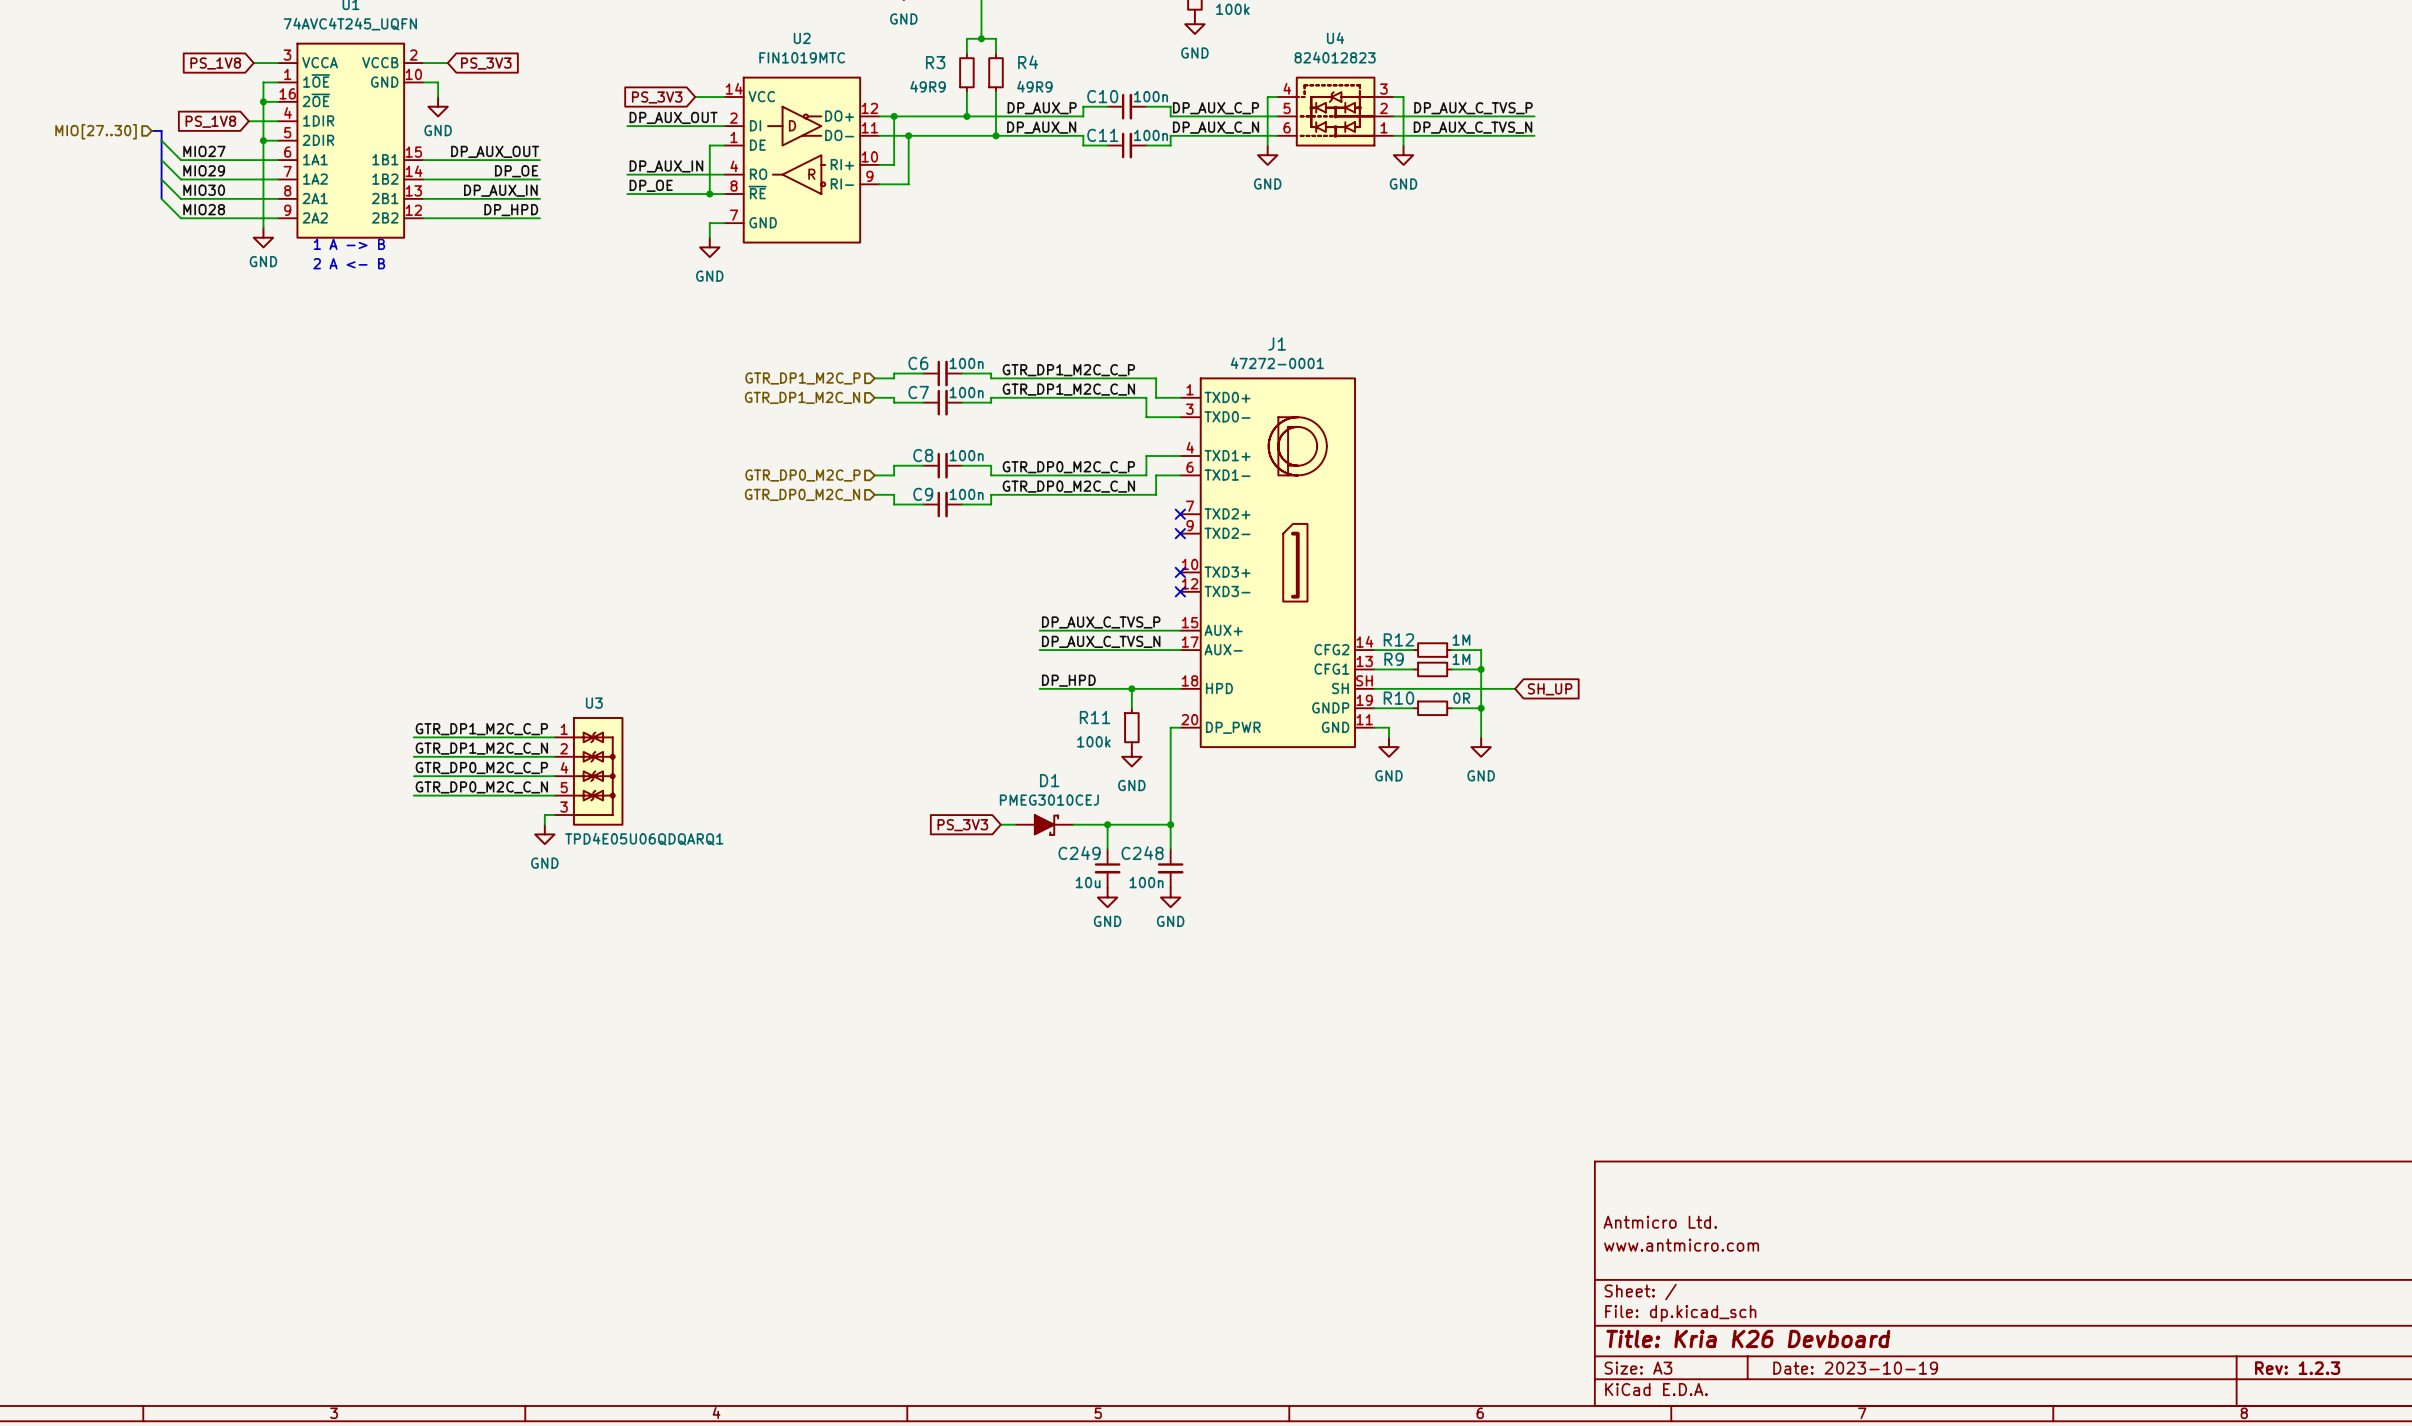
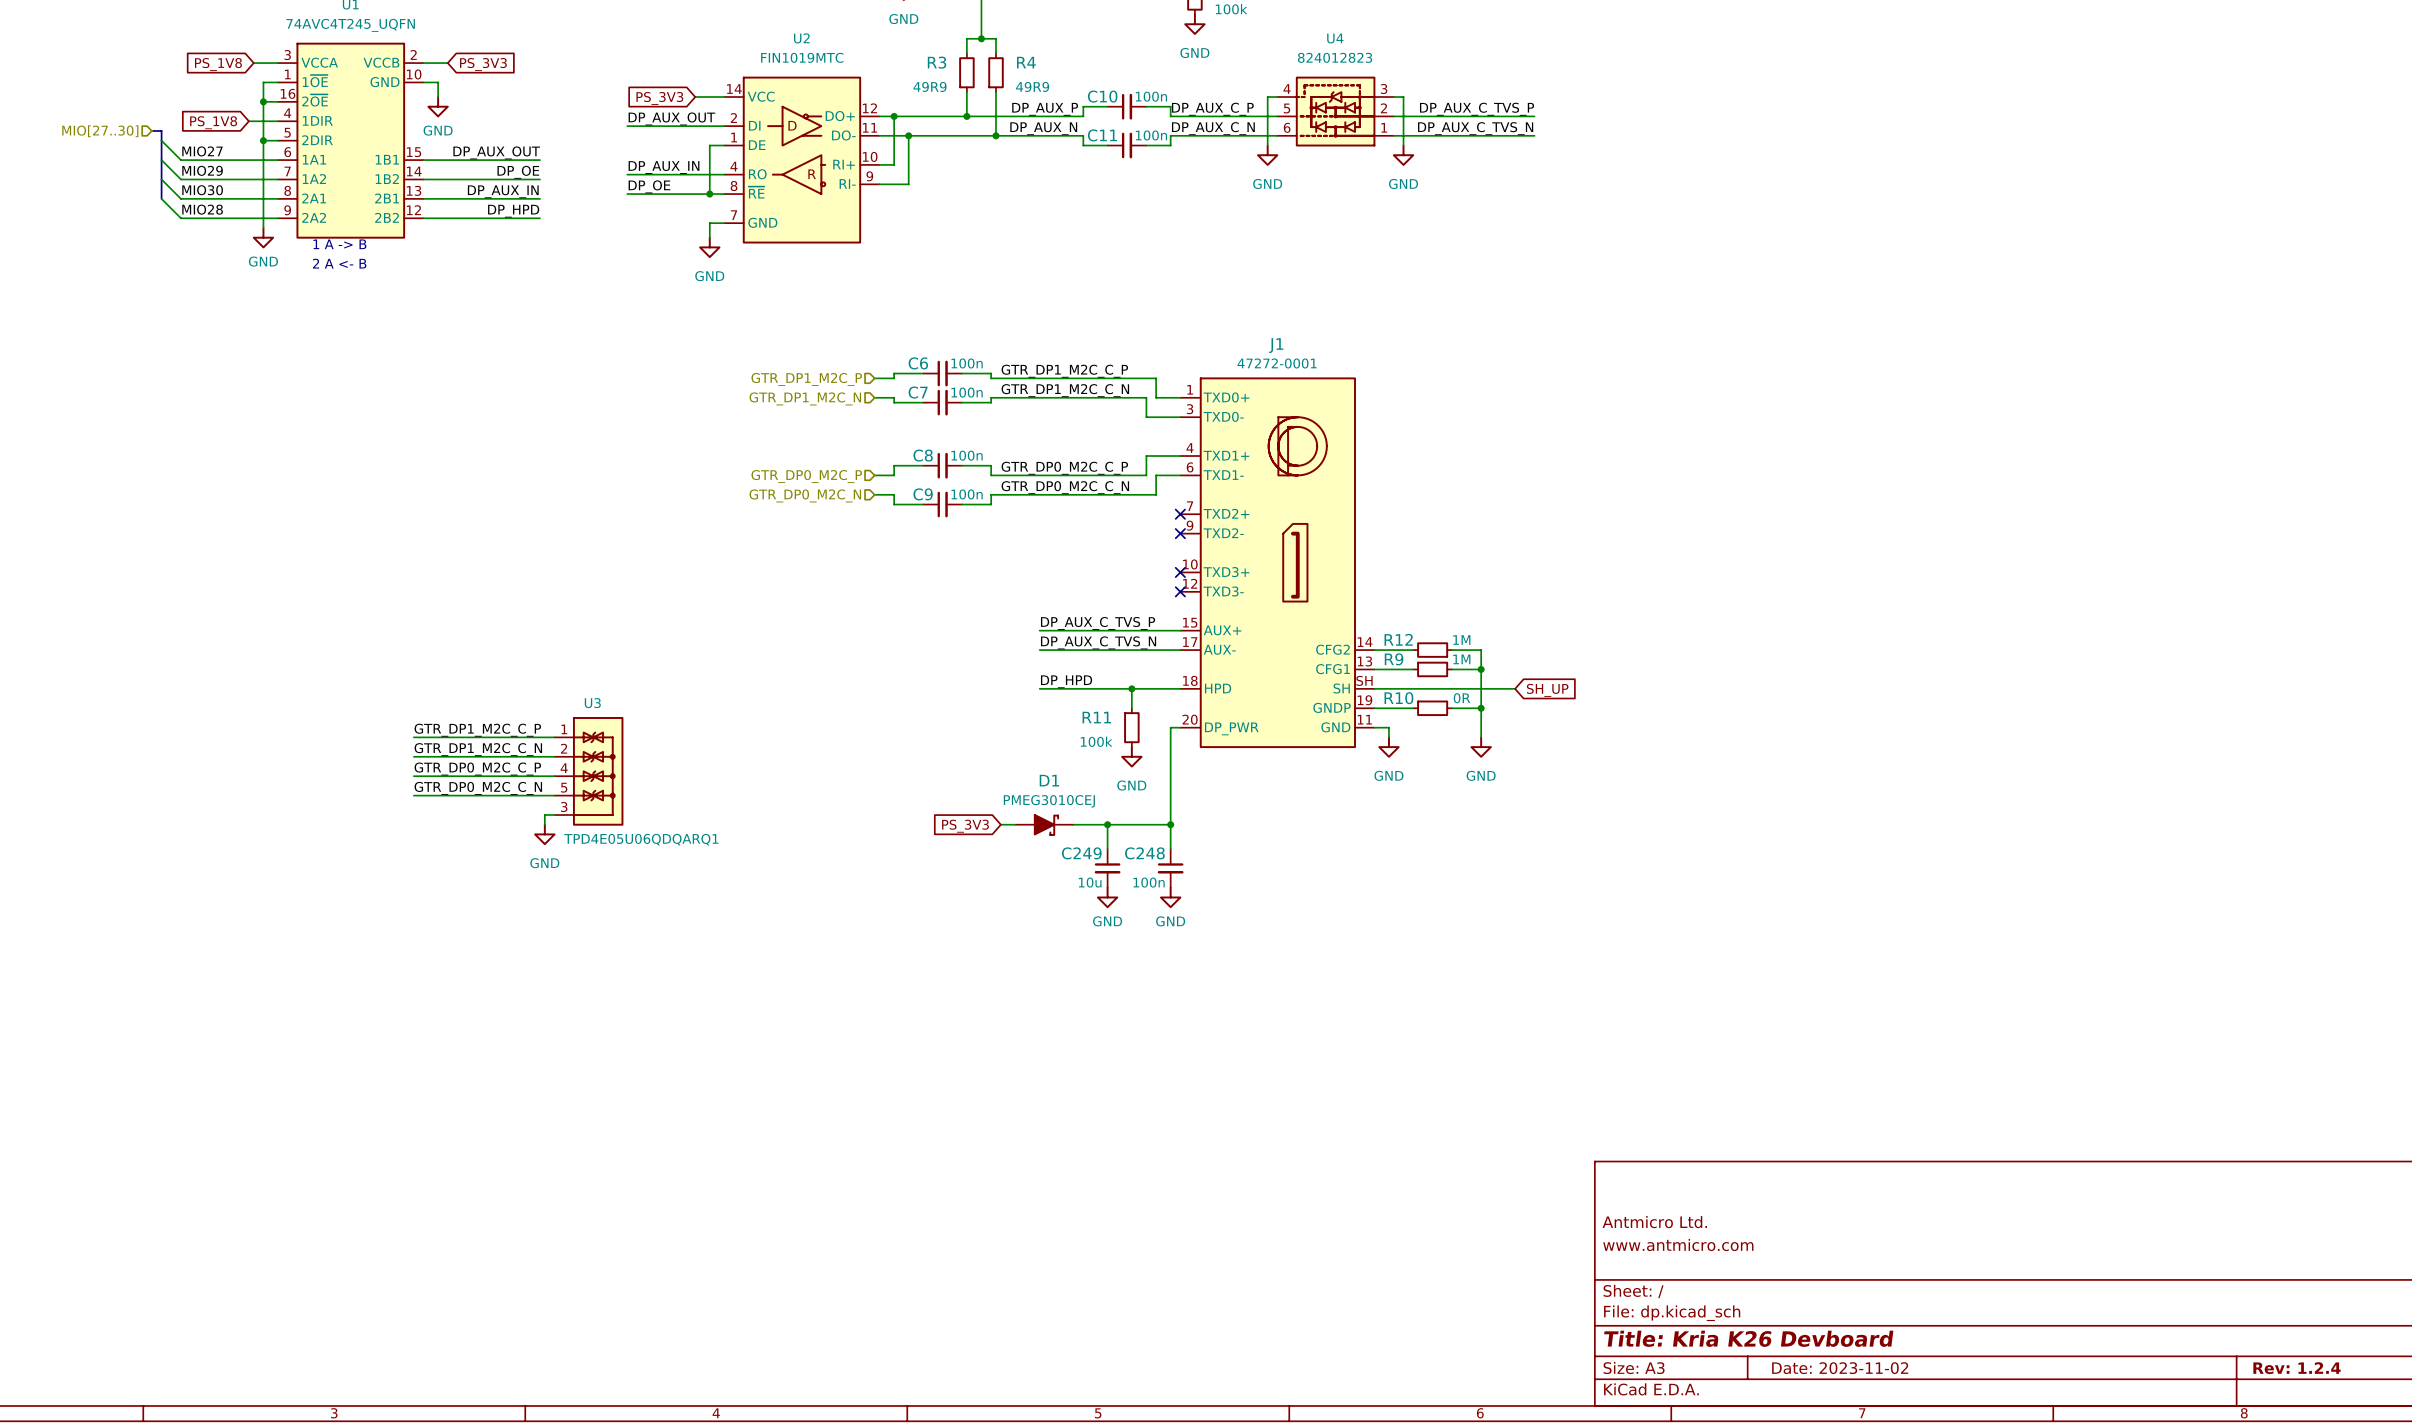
title block: Date: 2023-10-19 (1855, 1368) -> Date: 2023-11-02 (1840, 1368)
title block: Rev: 1.2.3 (2297, 1368) -> Rev: 1.2.4 (2297, 1368)

